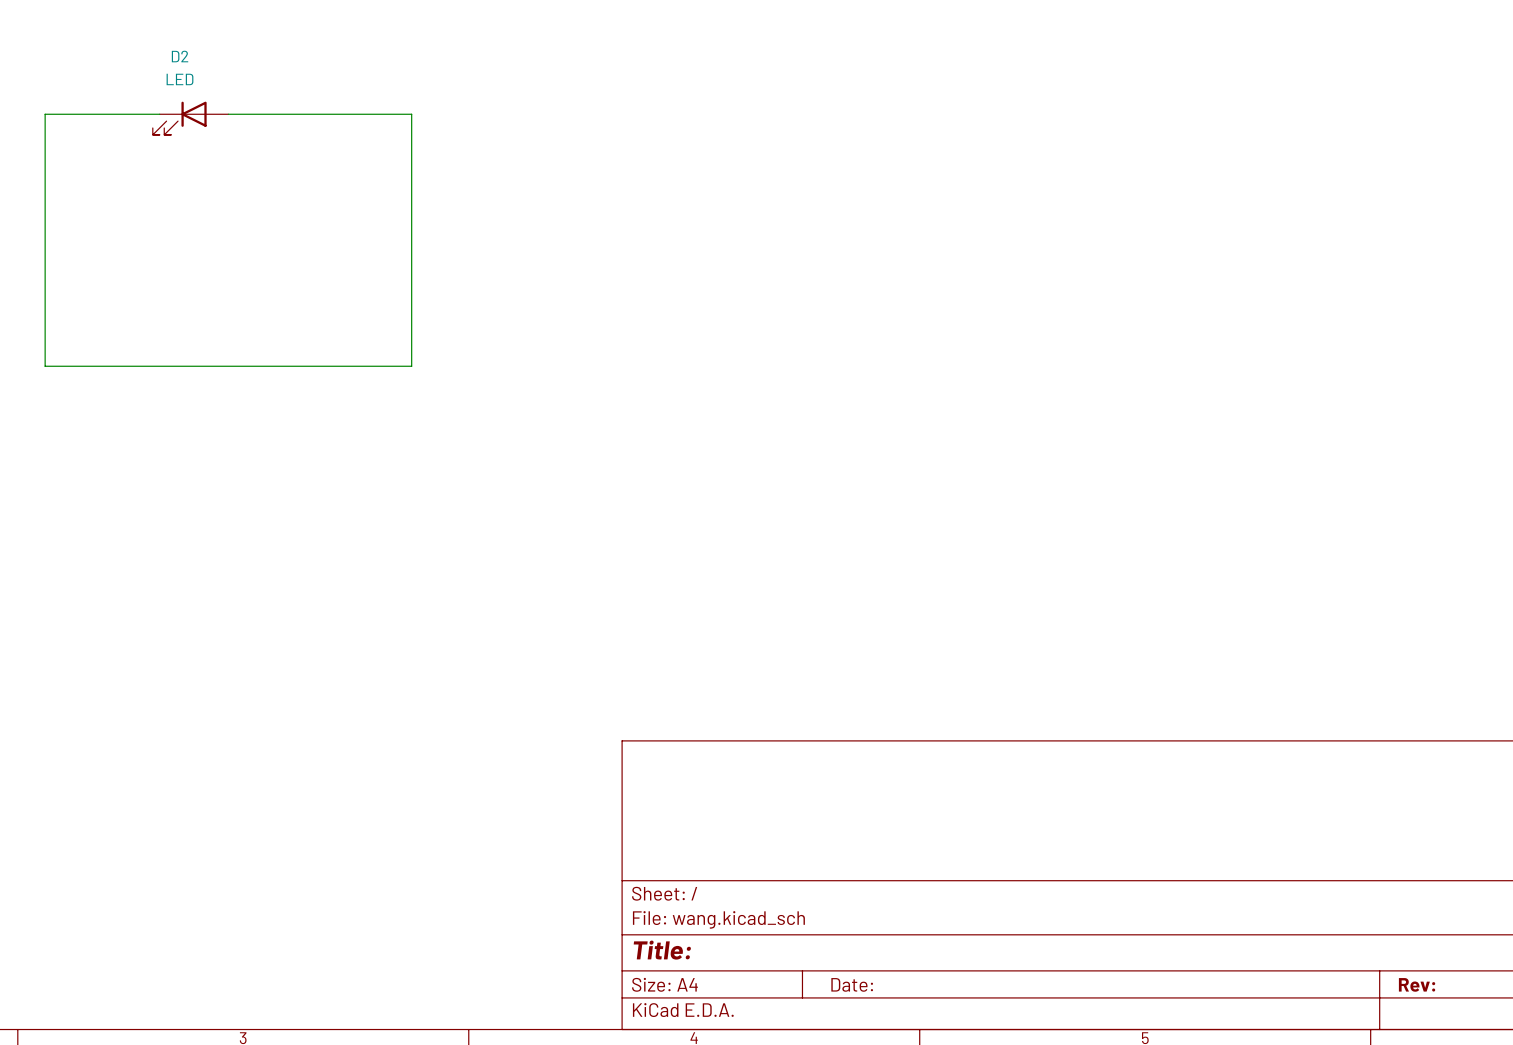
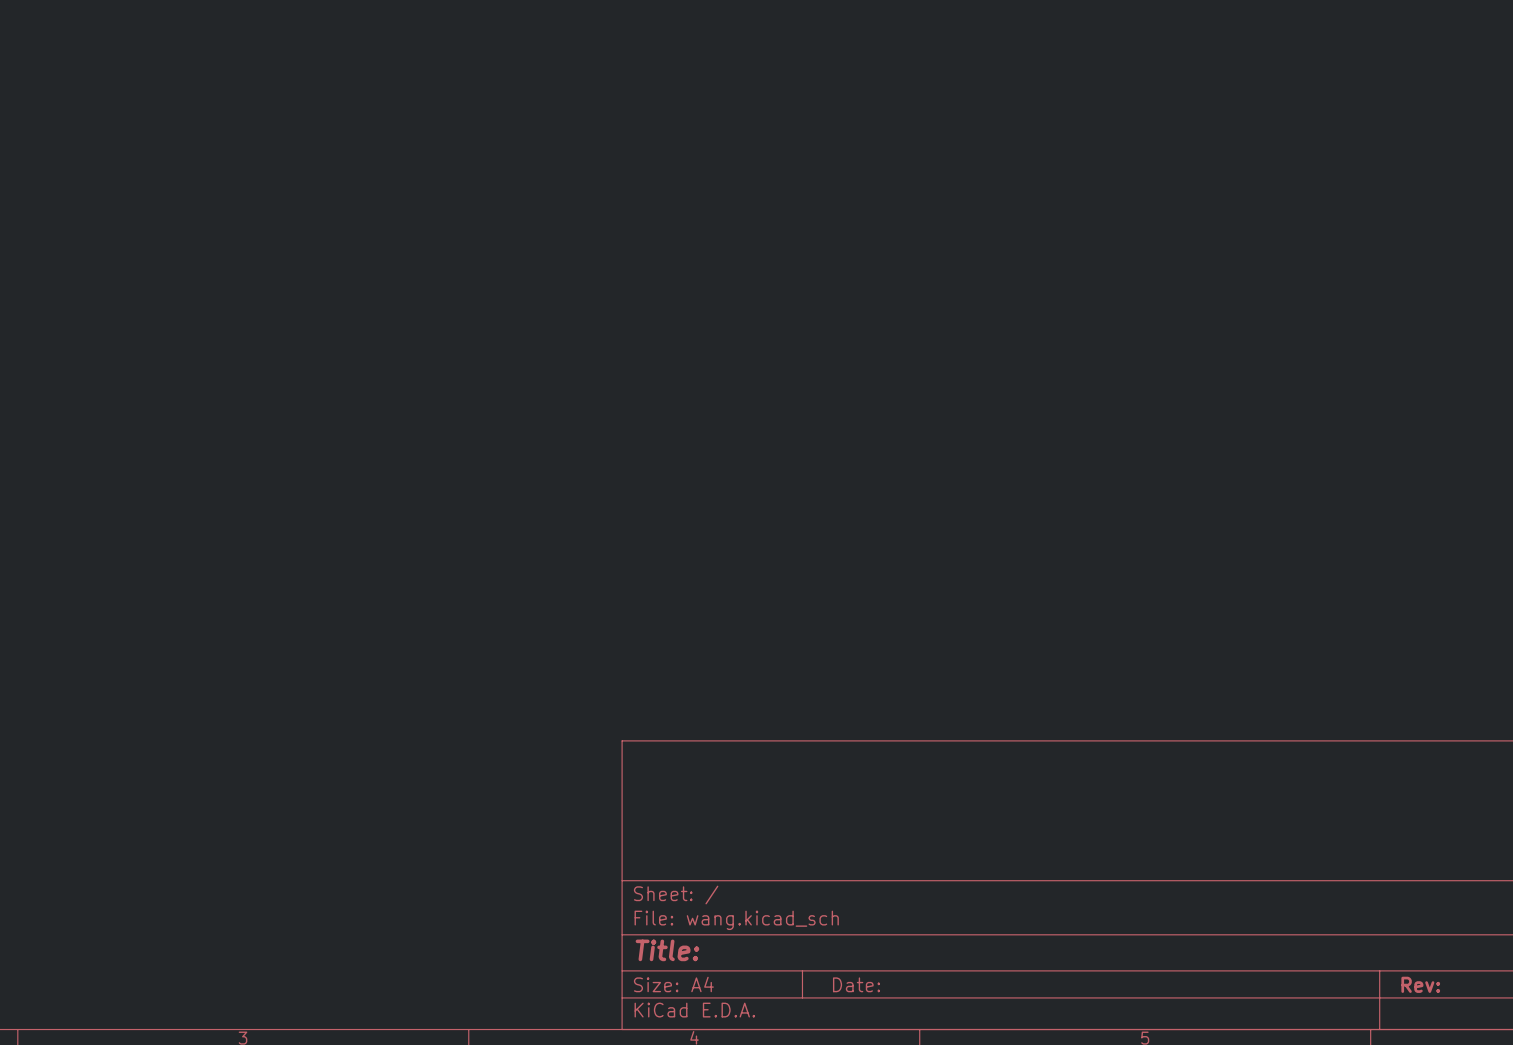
wire: (159, 114) (45, 114) (45, 366) (411, 366) (411, 114) (228, 114) -> none
D2: LED (190, 118) -> none

